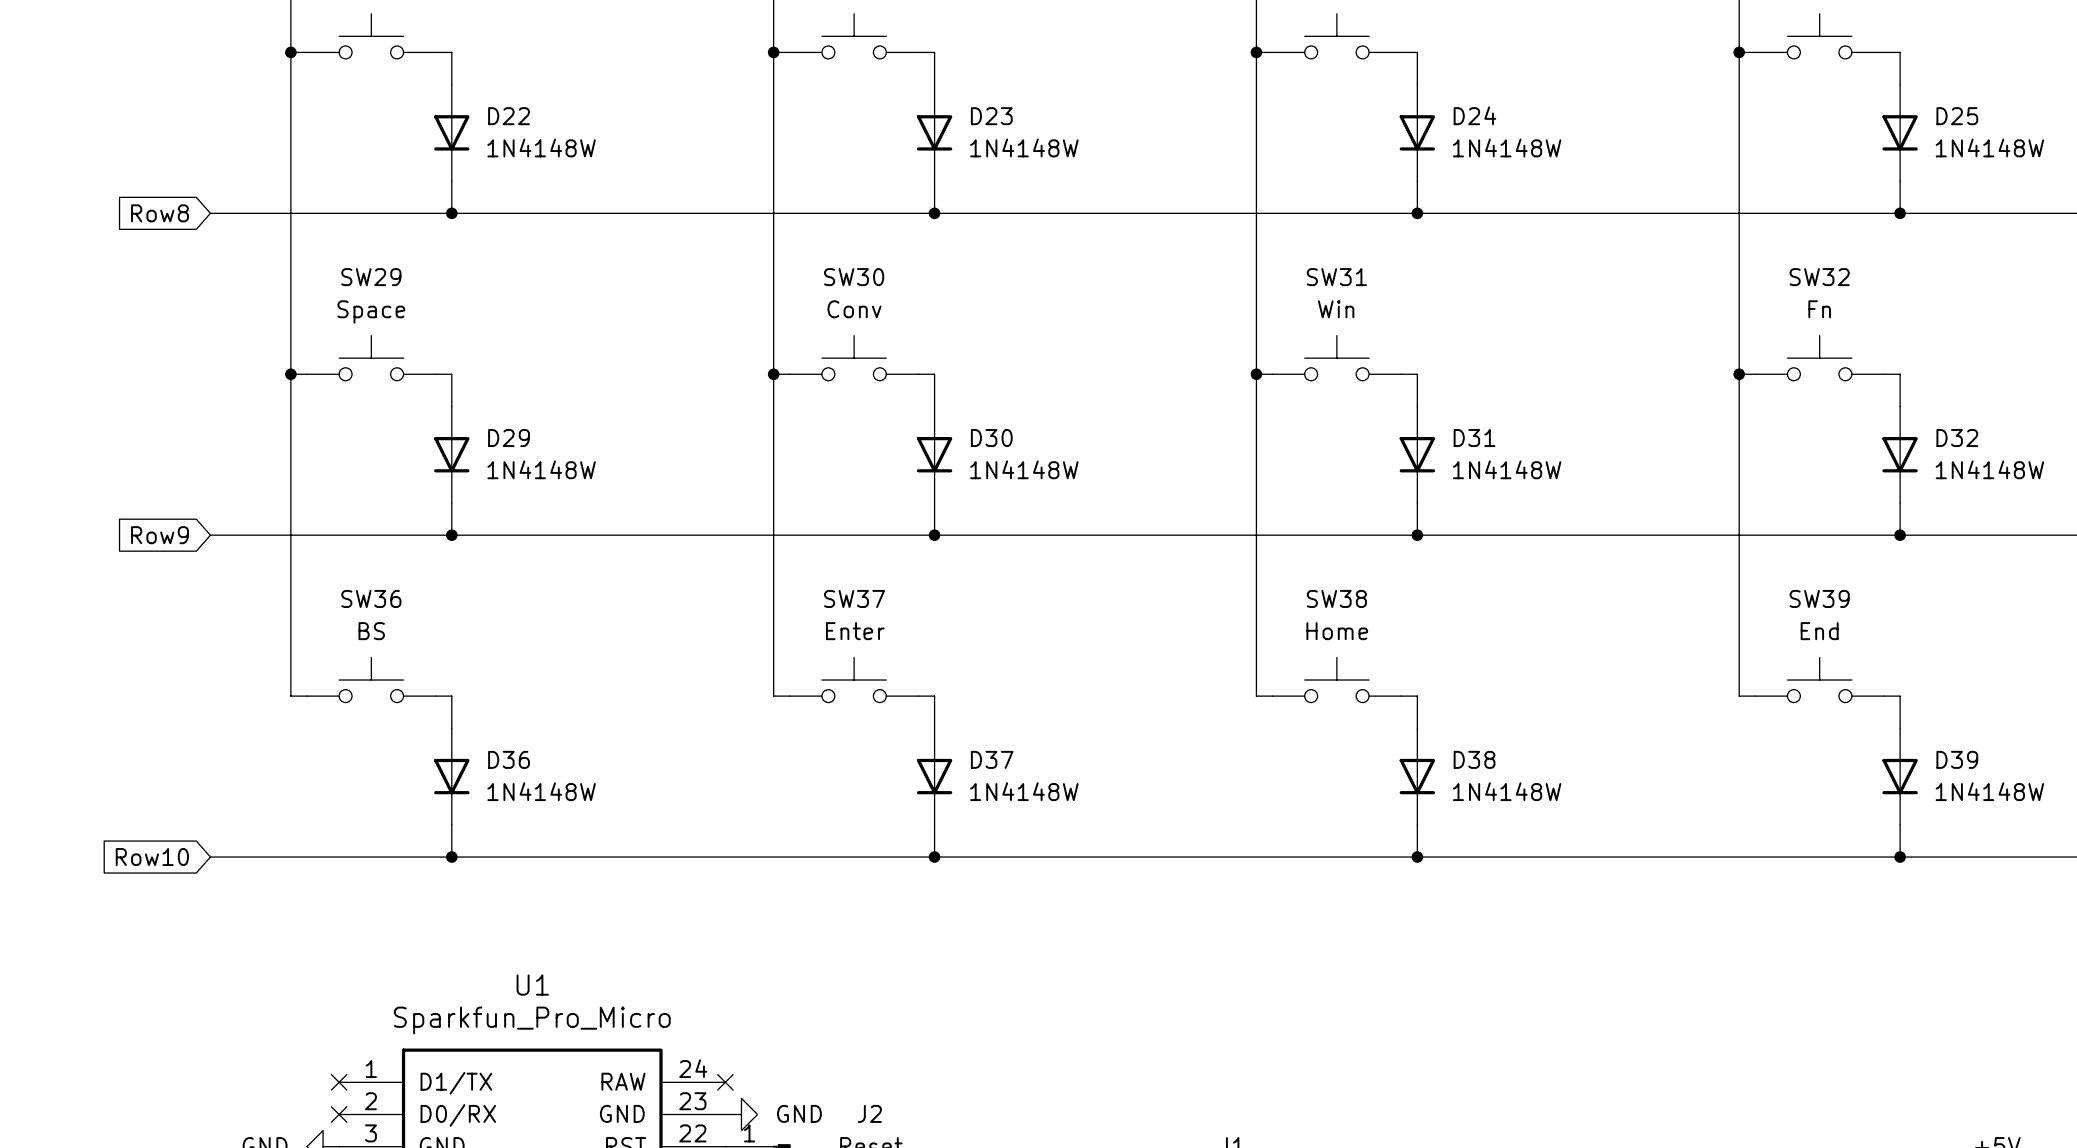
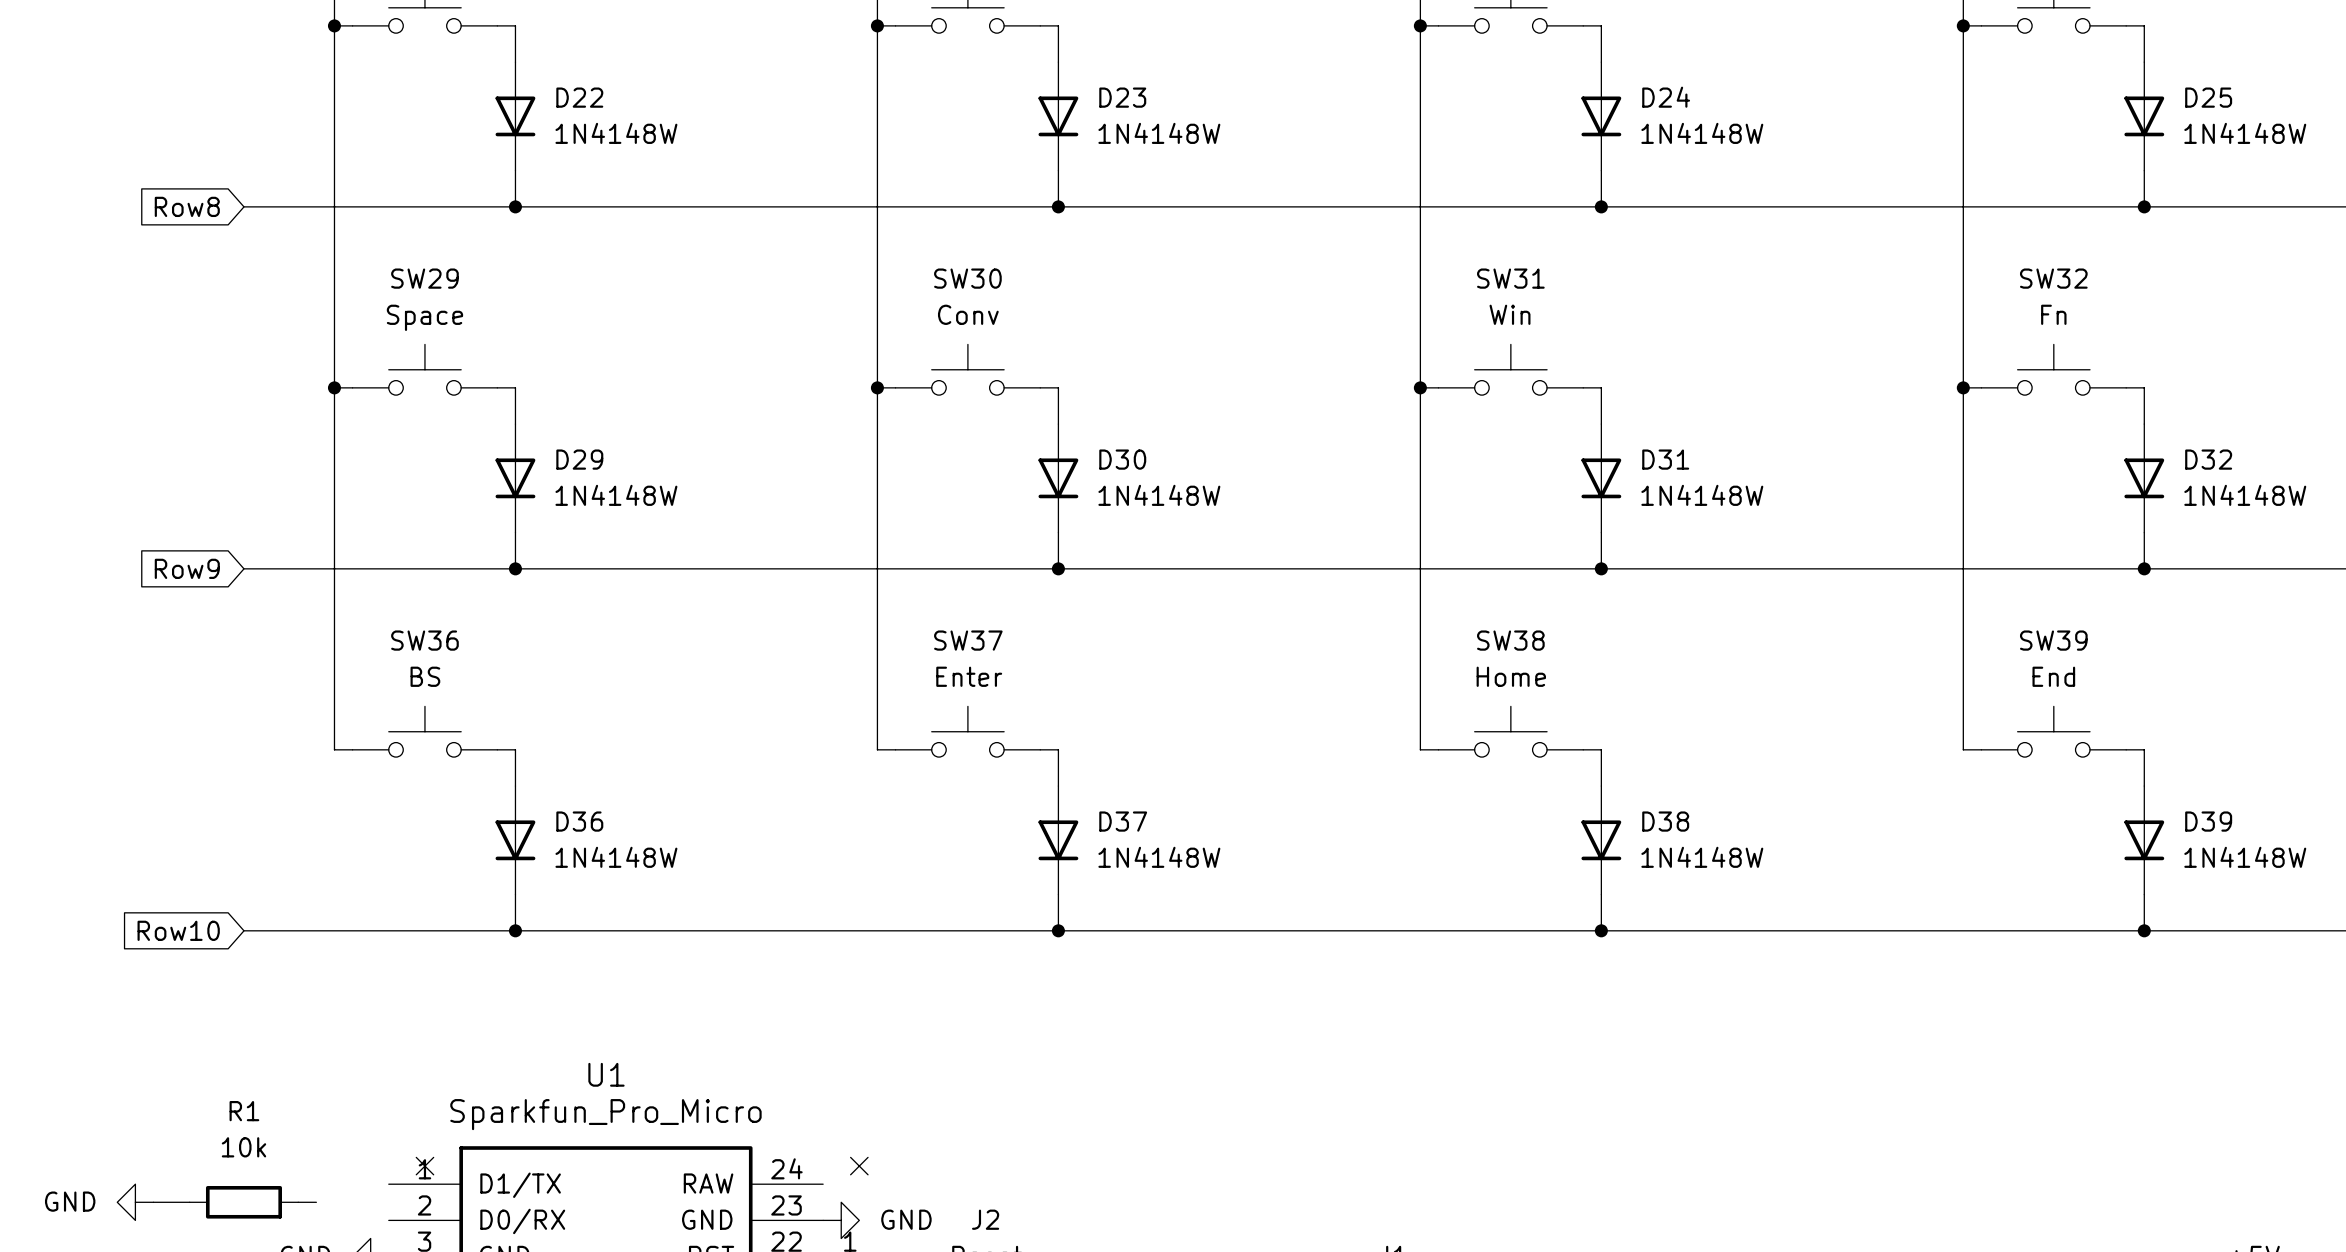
no-connect mark: none -> (424, 1166)
no-connect mark: (339, 1082) -> none
no-connect mark position: (725, 1082) -> (859, 1166)
power symbol: none -> GND (135, 1202)
wire: none -> (153, 1202) (189, 1202)
R1: none -> 10k (243, 1202)
wire: none -> (298, 1202) (316, 1202)
no-connect mark: (339, 1114) -> none

